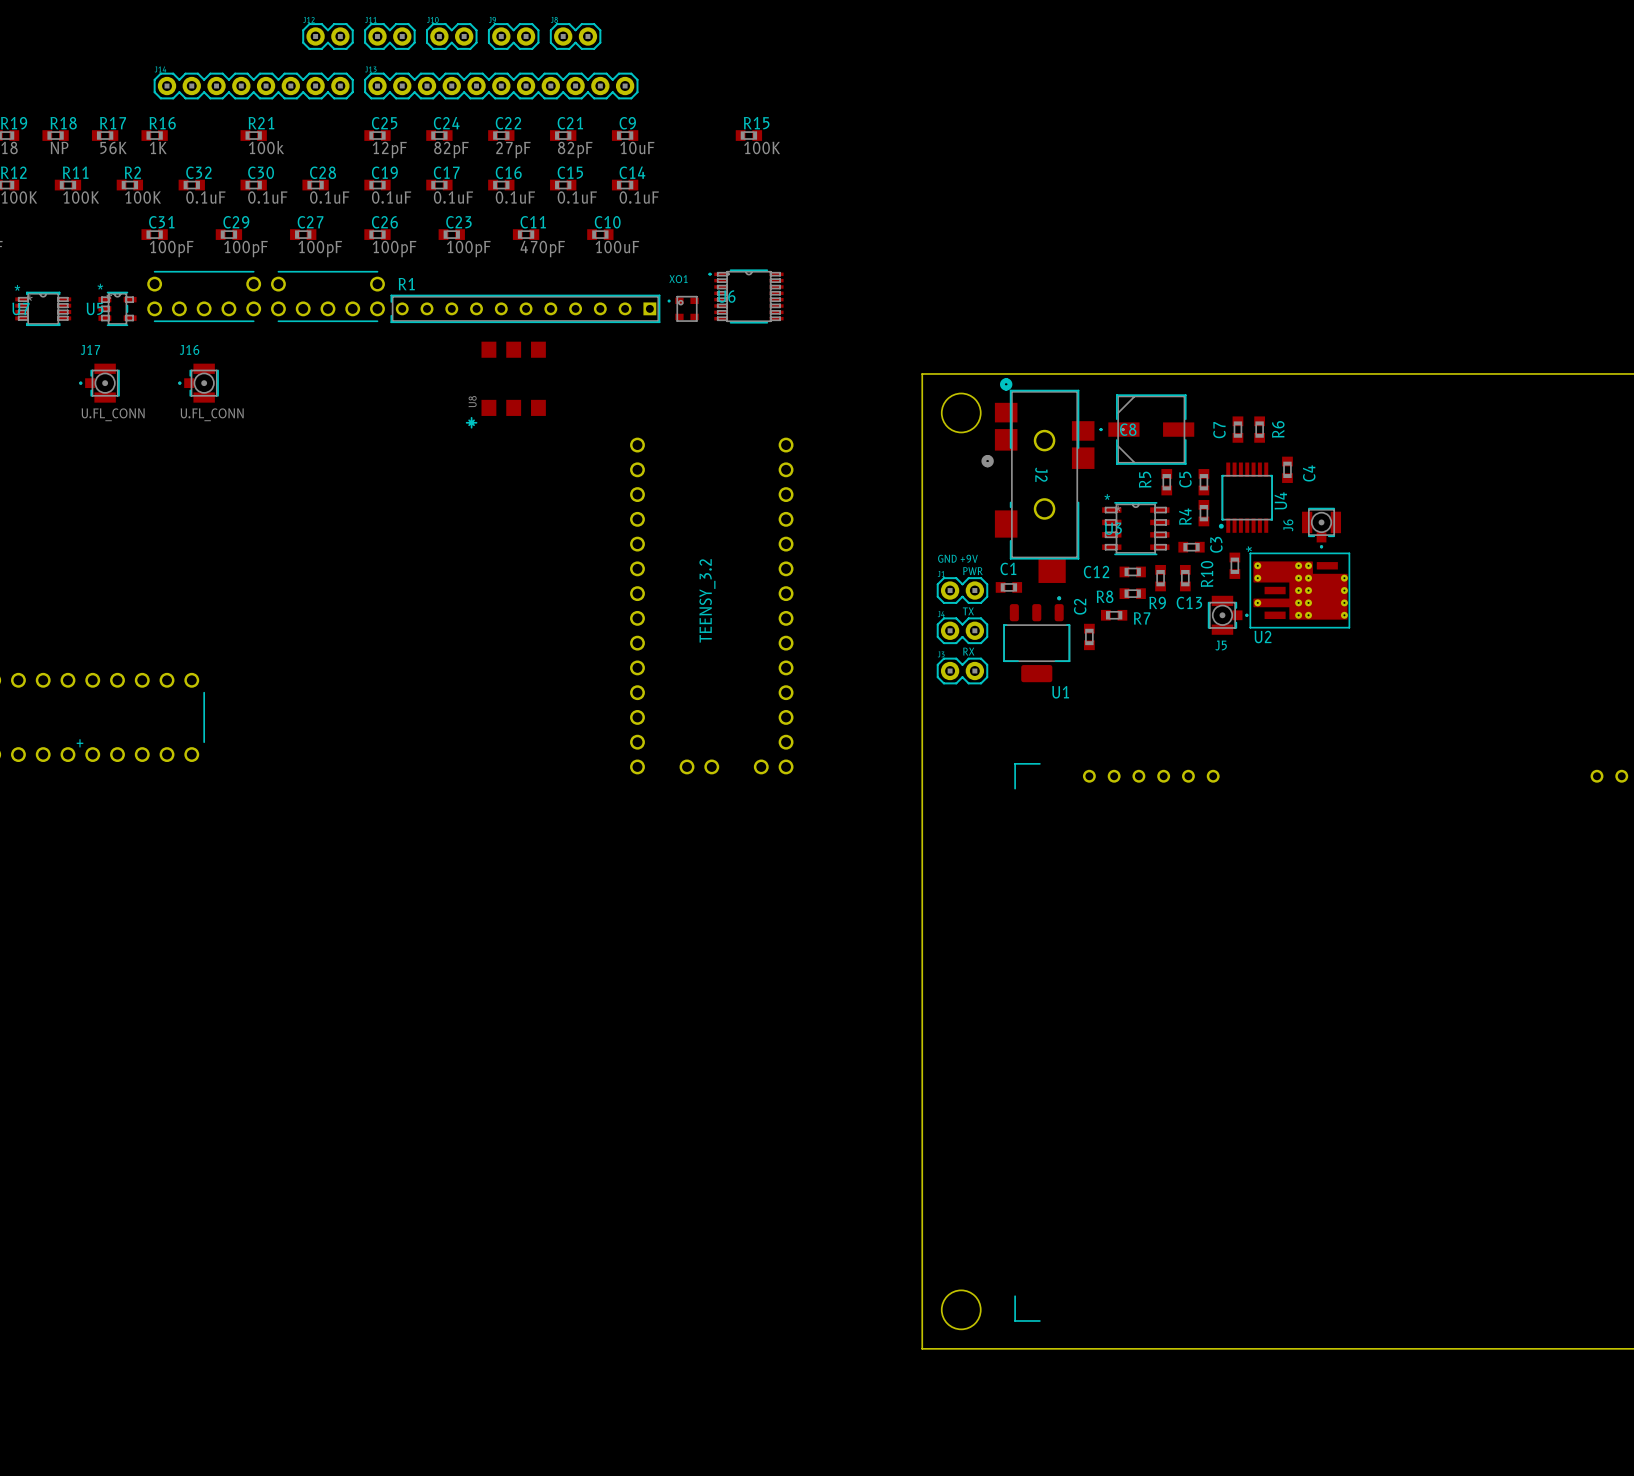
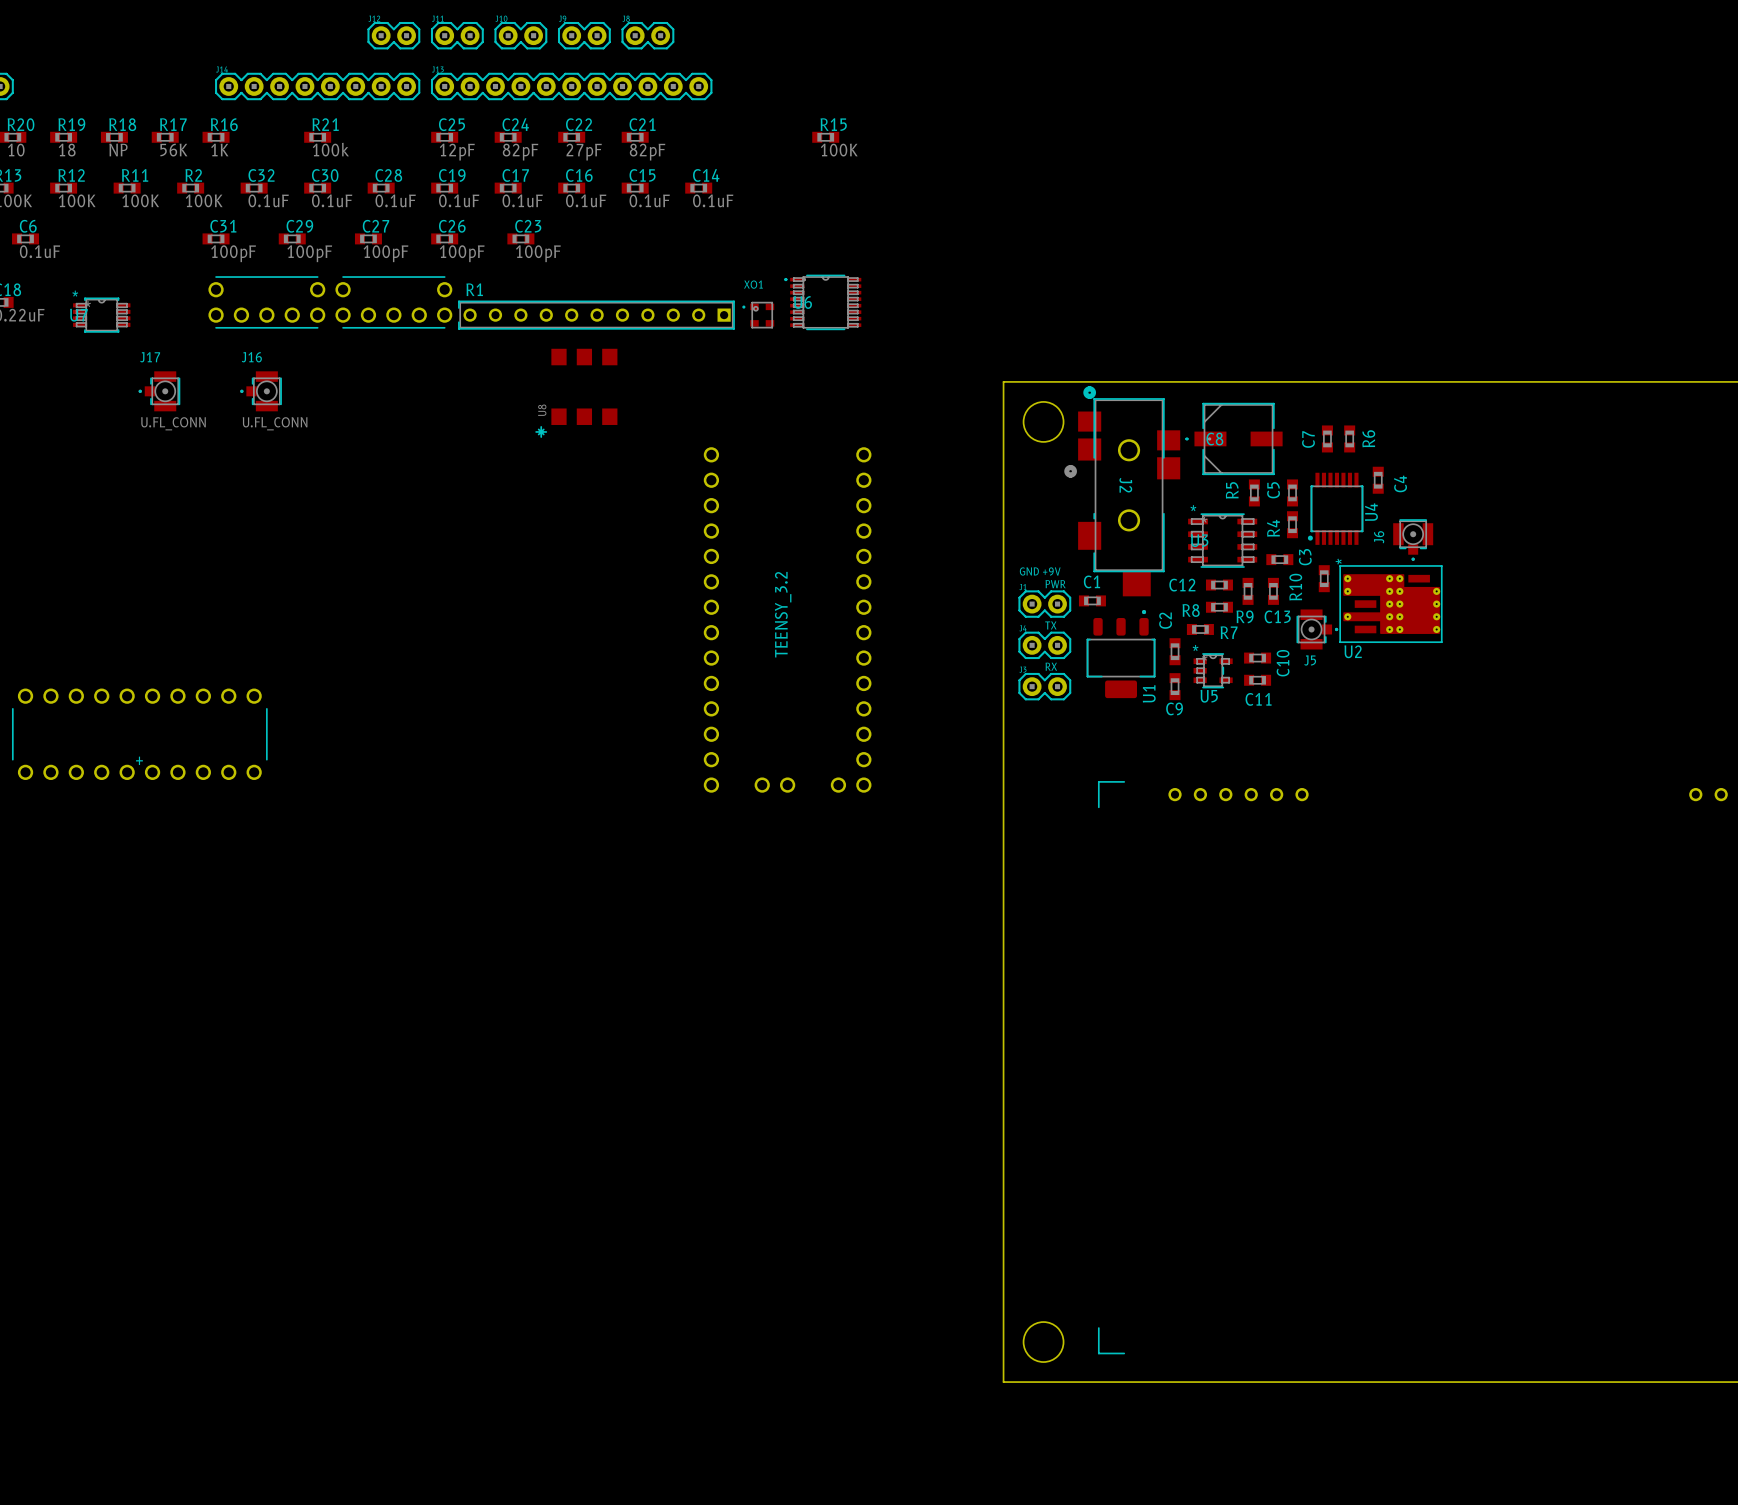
C9 rotation: 0° (625, 135) -> 90° clockwise (1175, 686)
C9 position: (625, 135) -> (1175, 686)
C9 value: 10uF (637, 147) -> none
C11 name position: C11 (533, 222) -> C11 (1258, 699)
C10 name rotation: 0° (607, 222) -> 90° counterclockwise (1283, 663)
C11 position: (526, 234) -> (1257, 680)
C10 position: (600, 234) -> (1257, 658)
C10 value: 100uF (617, 247) -> none
C11 value: 470pF (542, 249) -> none
U5 name position: U5 (95, 308) -> U5 (1209, 696)
U5 position: (117, 308) -> (1213, 670)
U1 name rotation: 0° (1060, 692) -> 90° counterclockwise (1149, 693)

